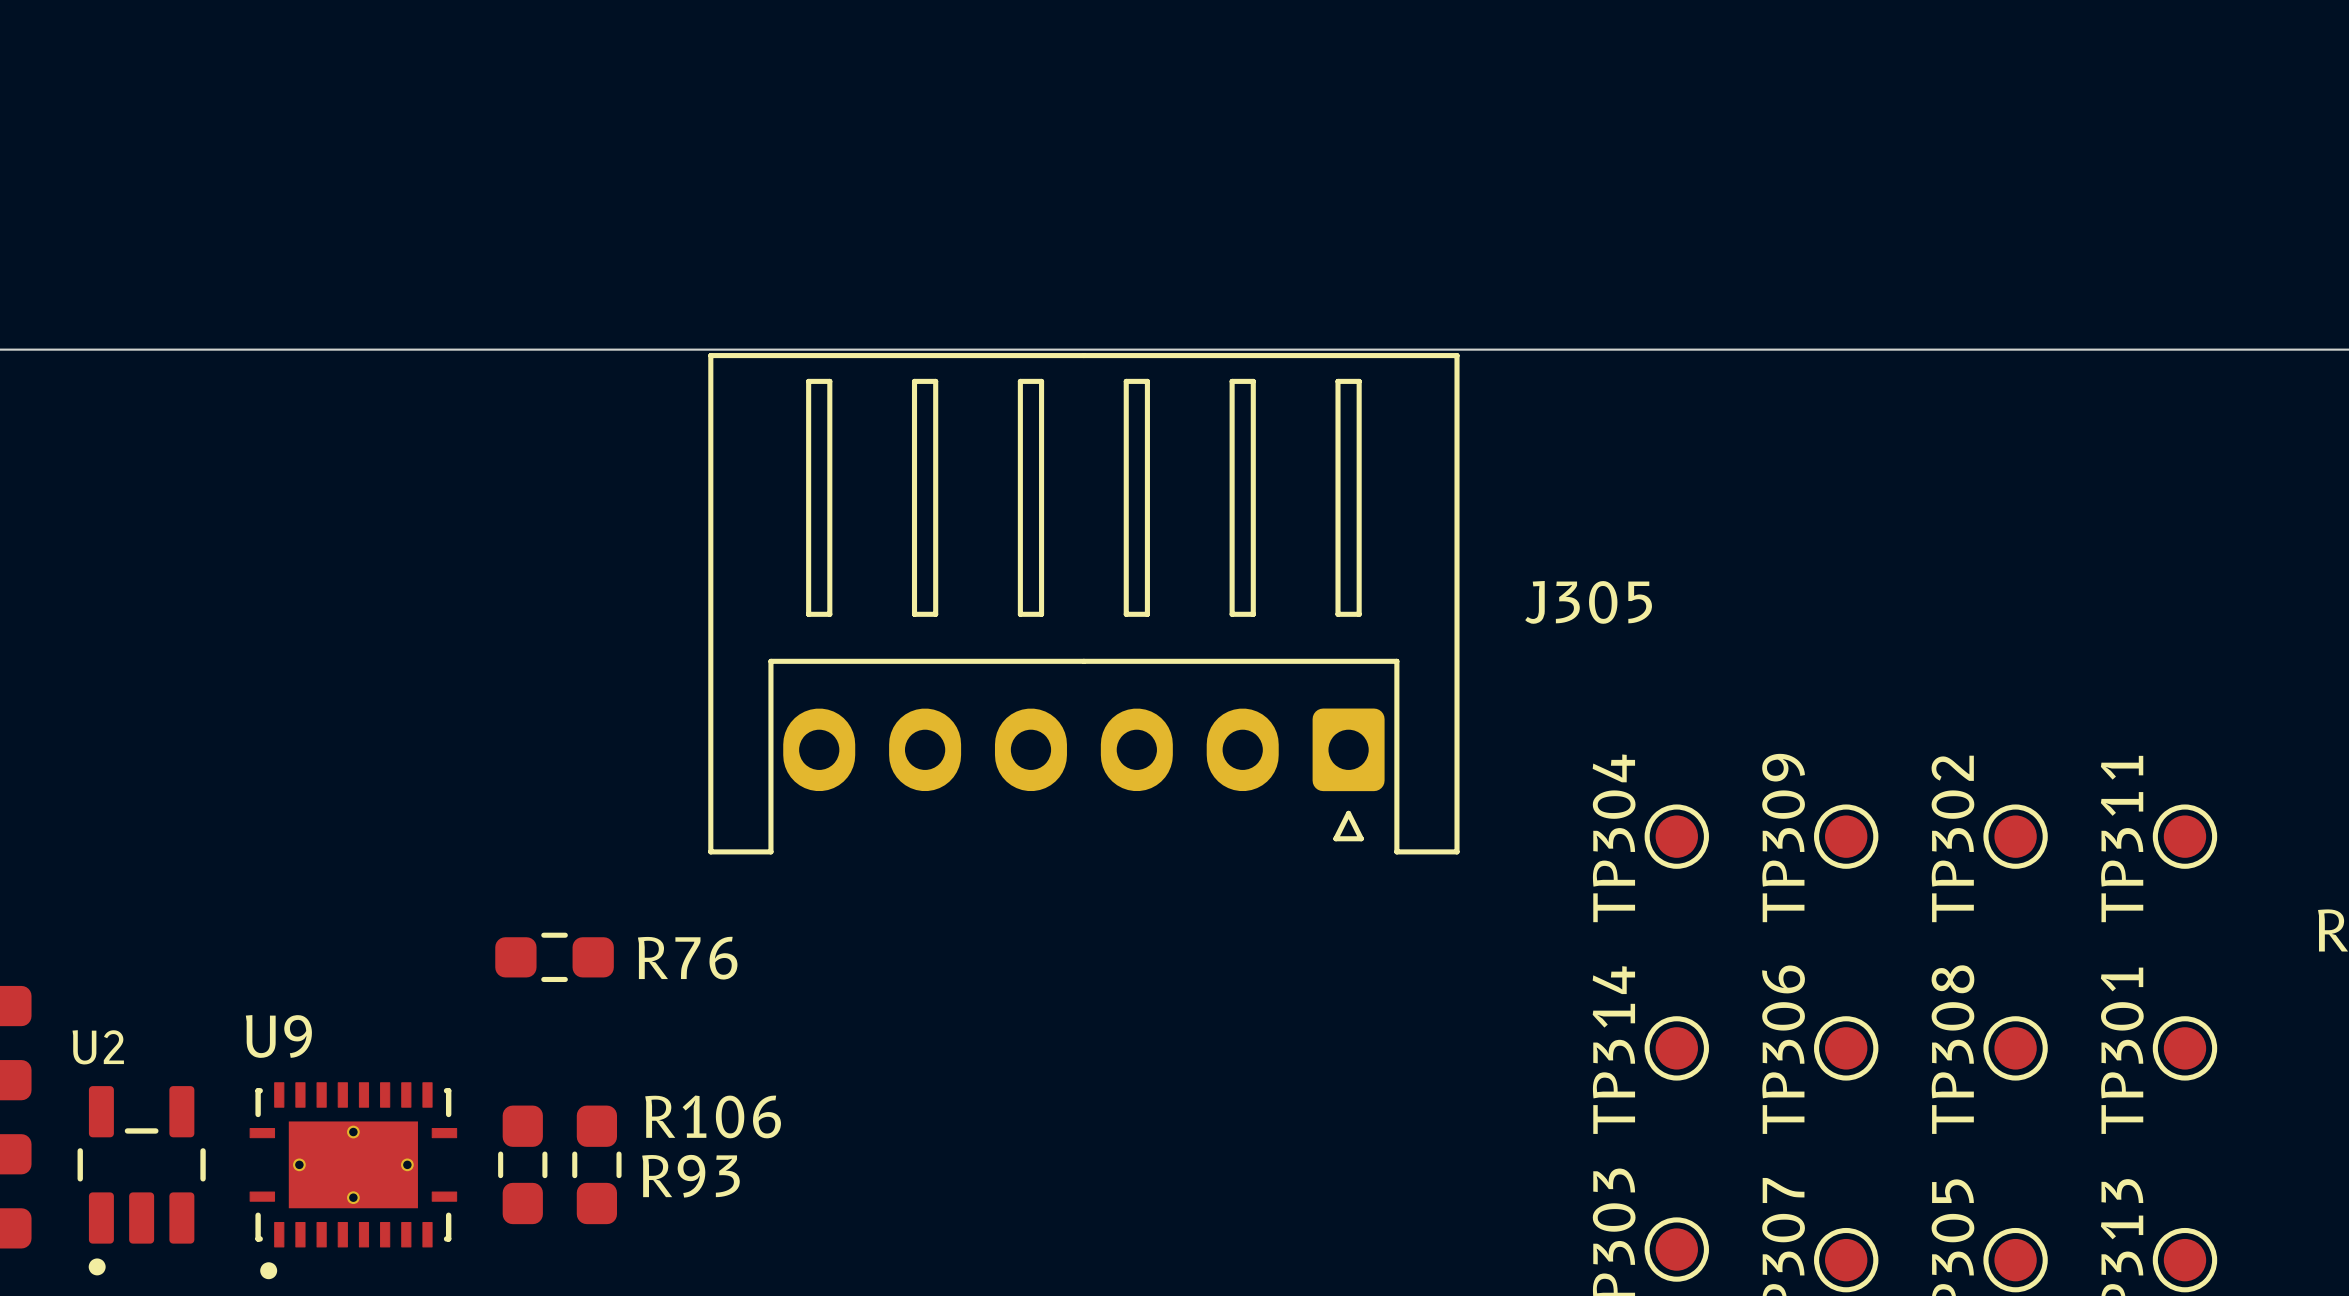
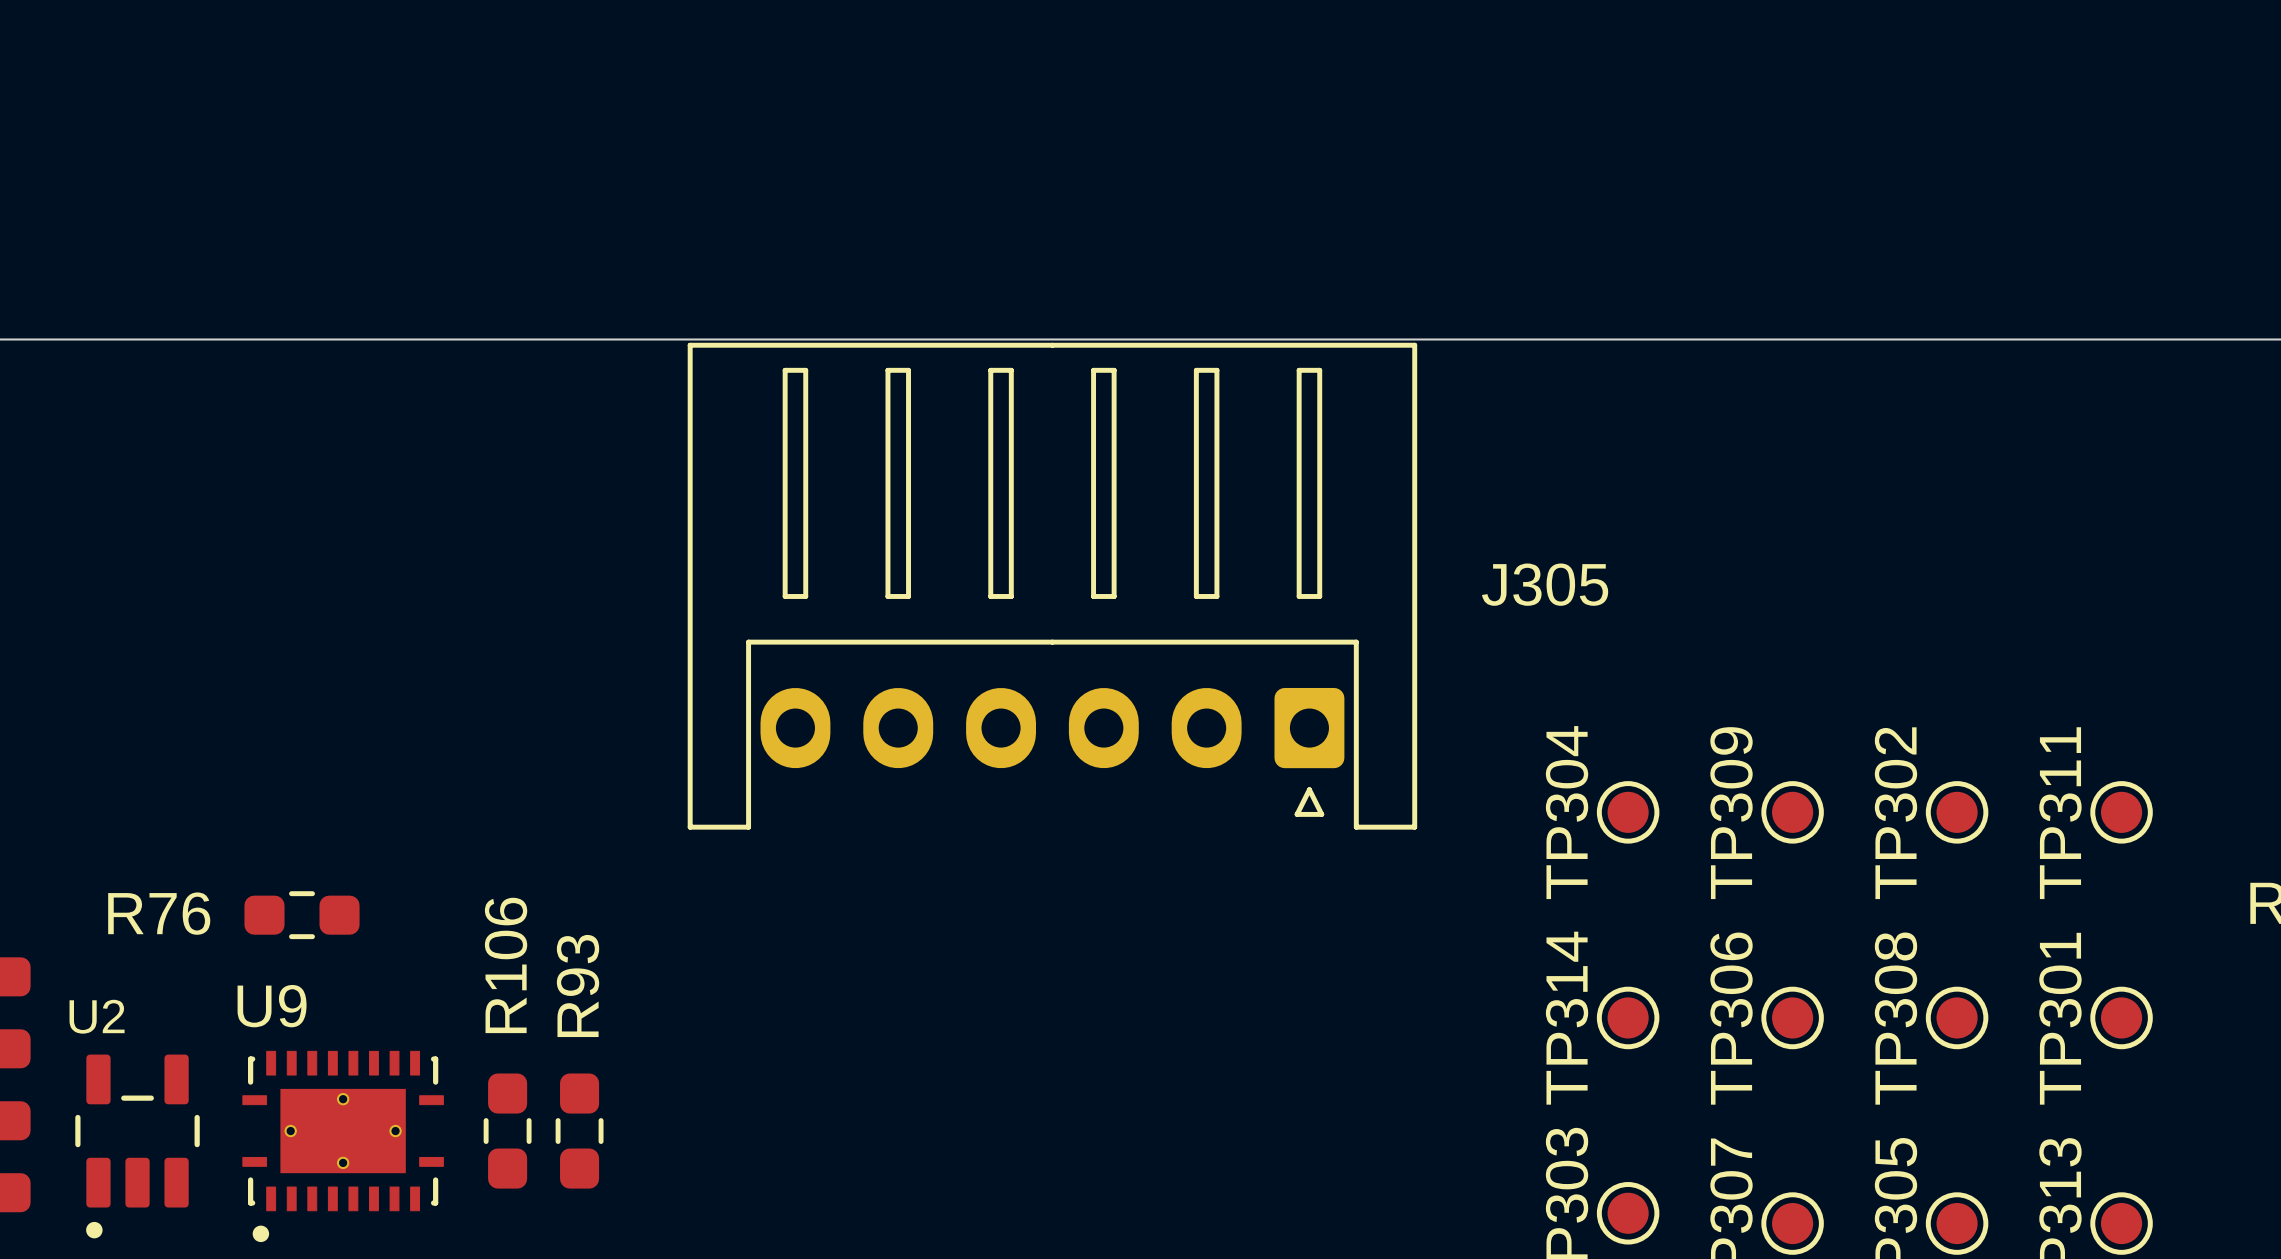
R76 position: (554, 957) -> (302, 915)
R76 name position: R76 (687, 958) -> R76 (159, 913)
R106 name rotation: 0° (713, 1116) -> 90° counterclockwise (506, 965)
R106 name position: R106 (713, 1116) -> R106 (506, 965)
R93 name rotation: 0° (690, 1176) -> 90° counterclockwise (578, 985)
R93 name position: R93 (690, 1176) -> R93 (578, 985)

